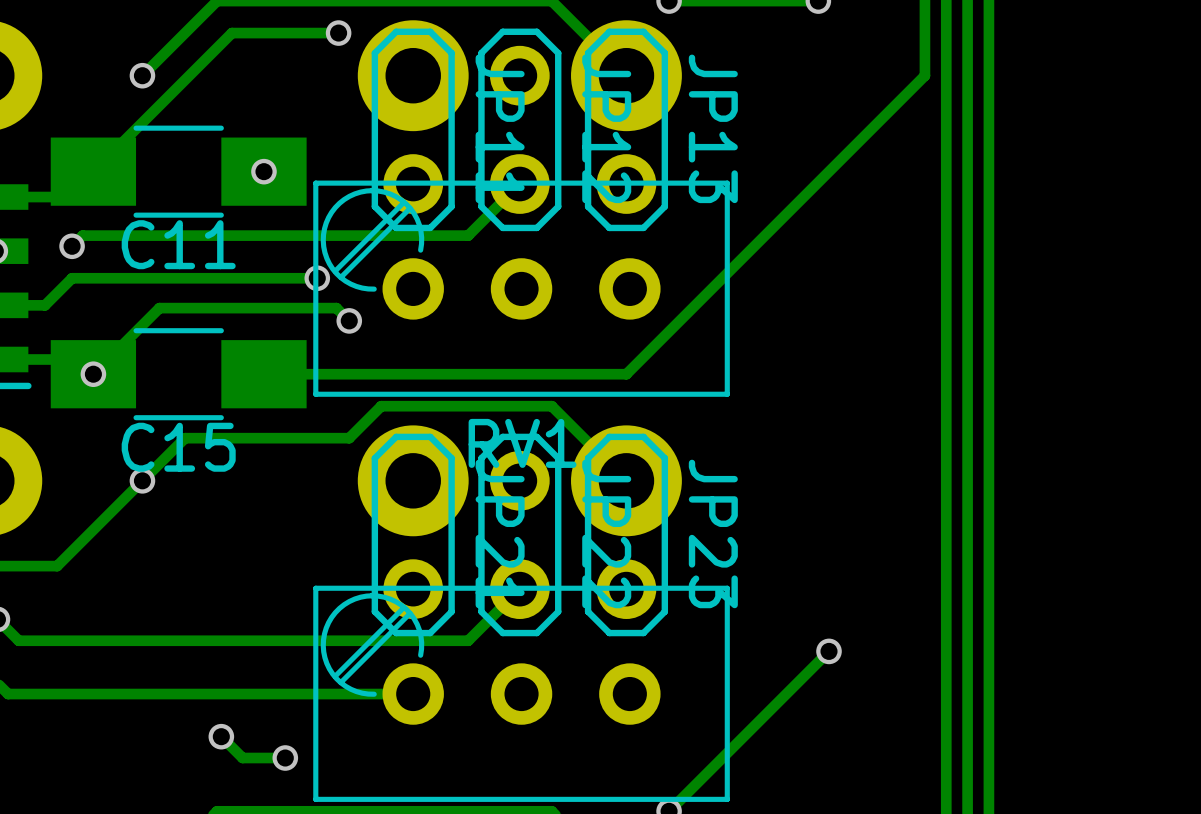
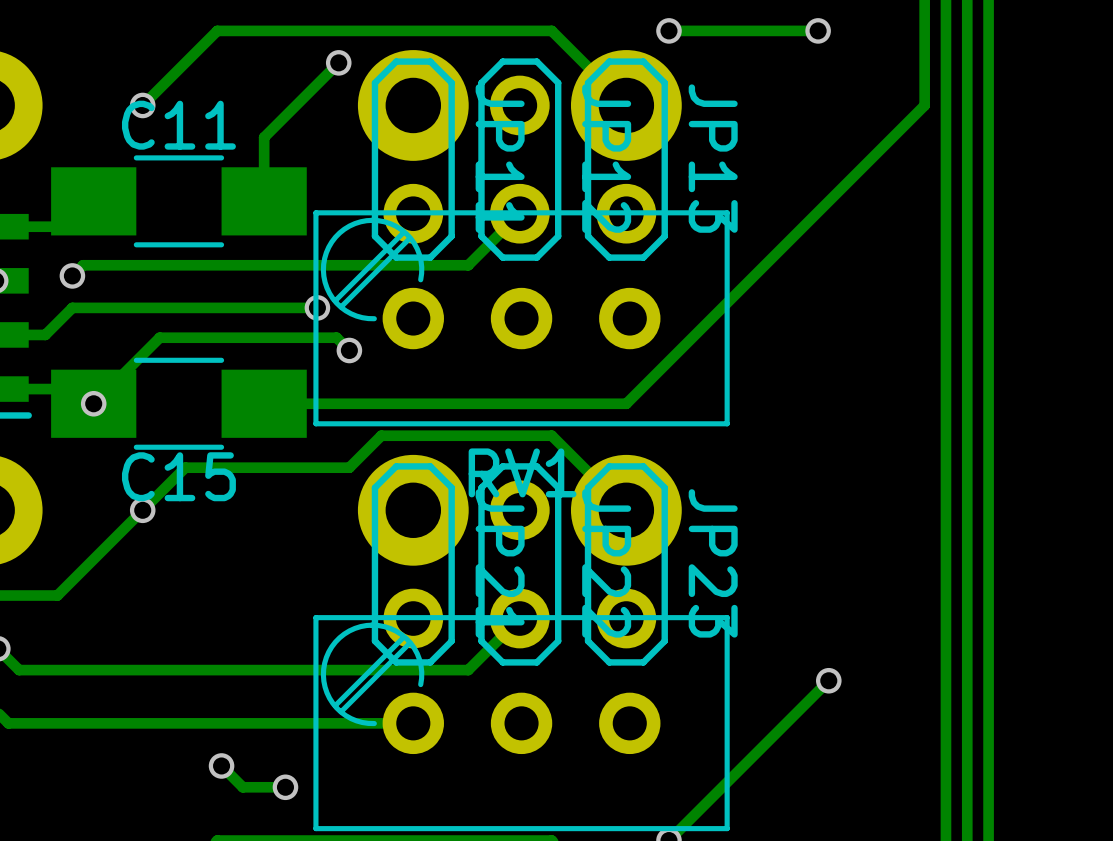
track: (338, 33) (231, 33) (93, 171) -> (338, 62) (264, 137) (264, 201)
via: (263, 171) -> none
C11 name position: C11 (178, 244) -> C11 (178, 125)

